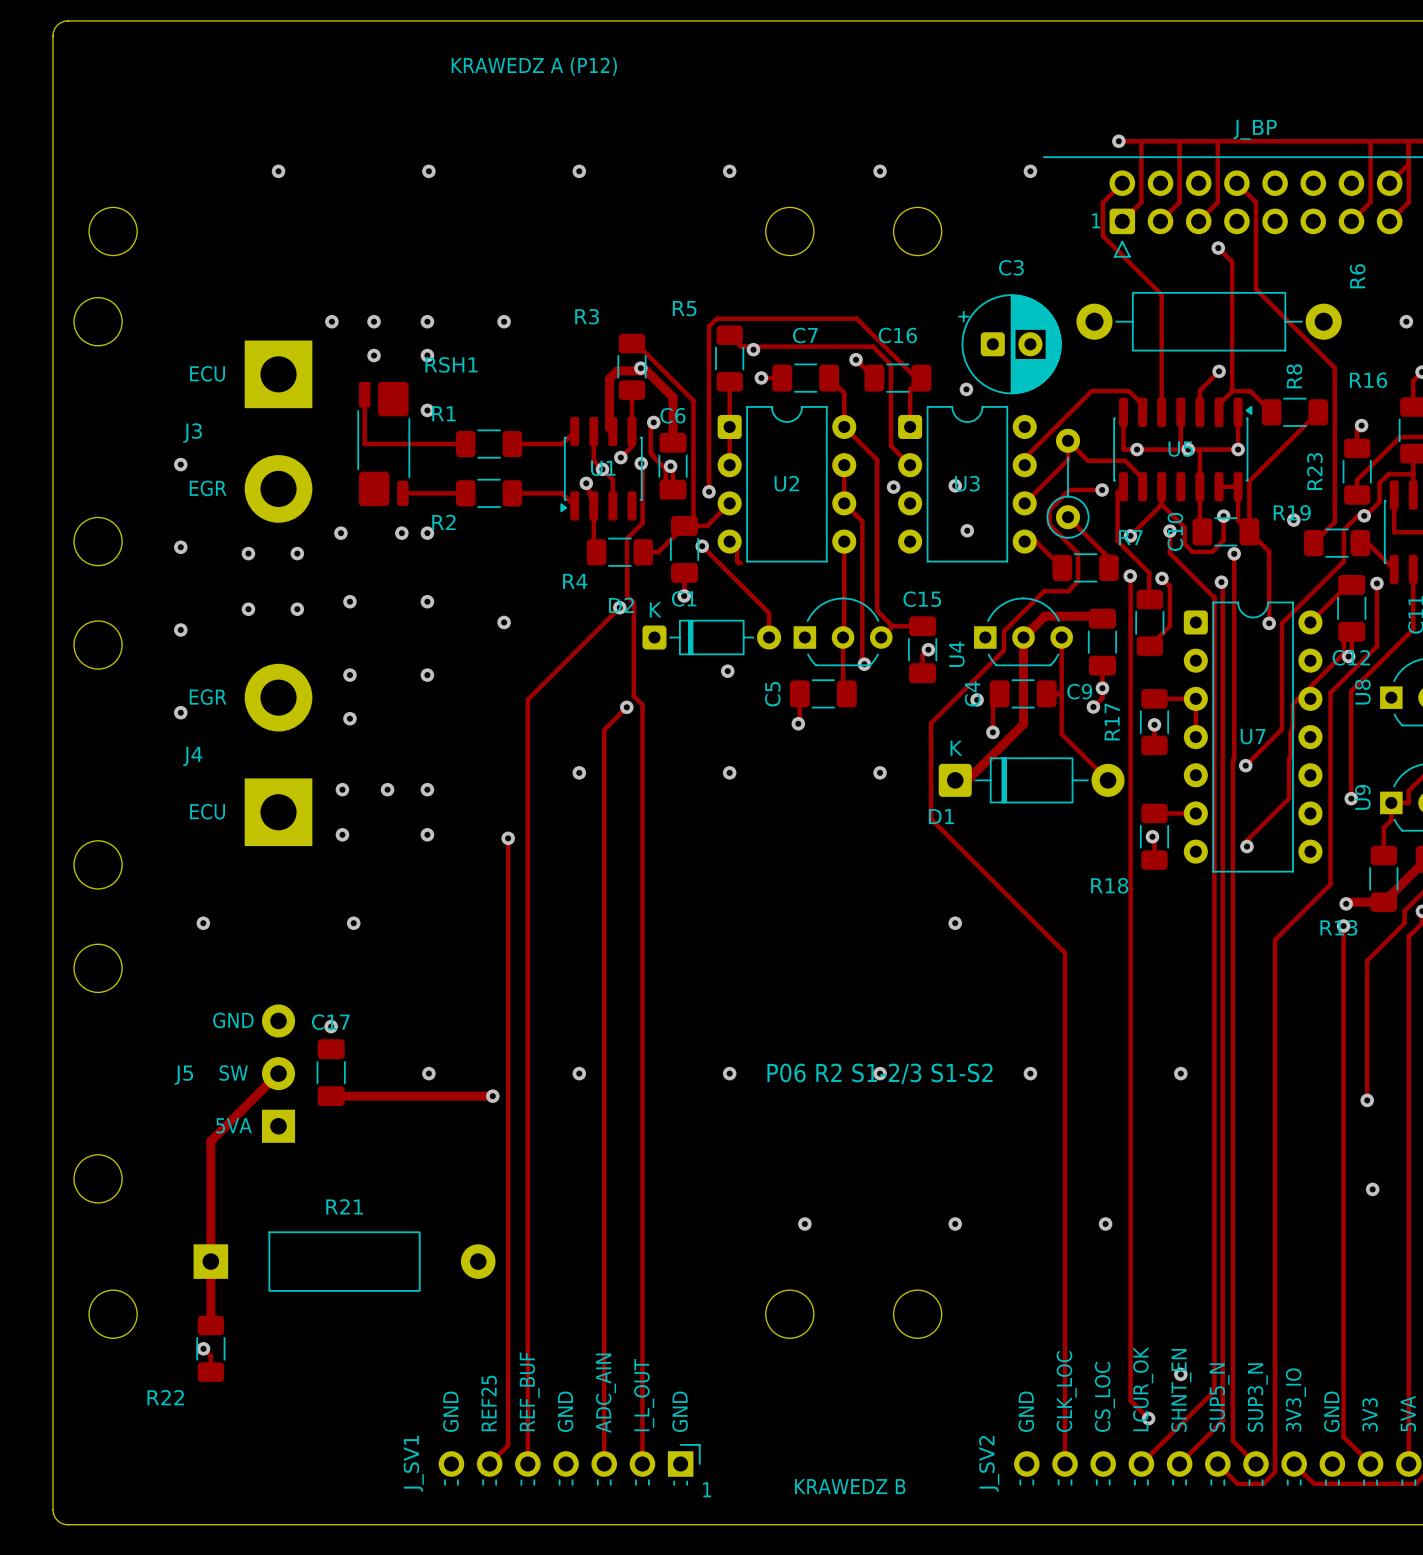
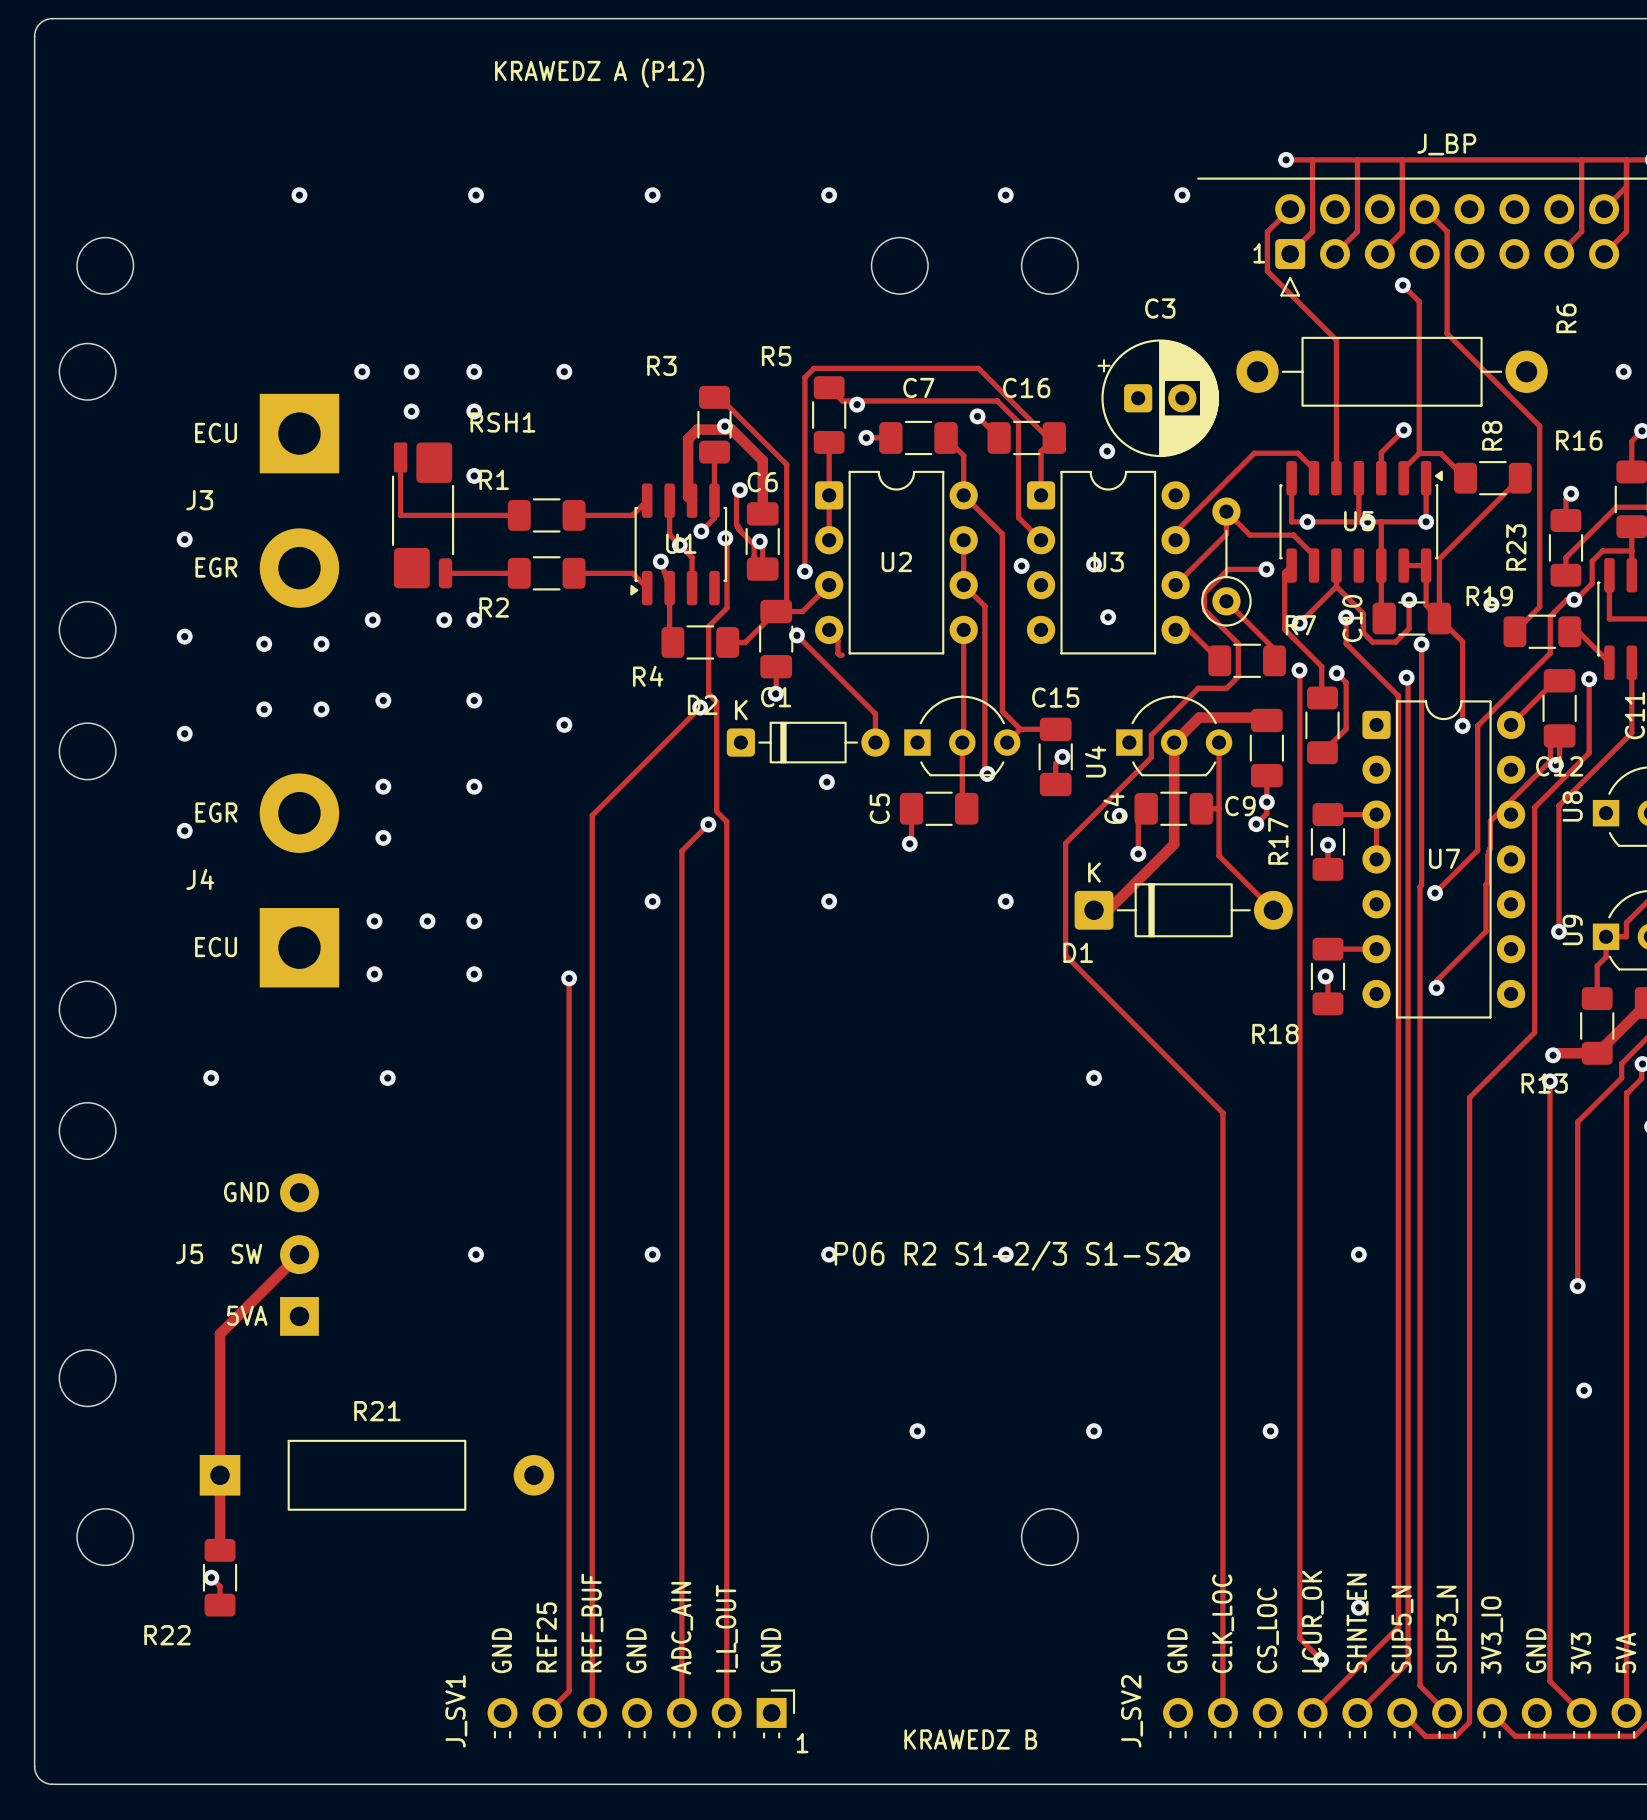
via: (331, 1026) -> none
C17: (331, 1072) -> none
track: (331, 1096) (492, 1096) -> none
via: (492, 1096) -> none

